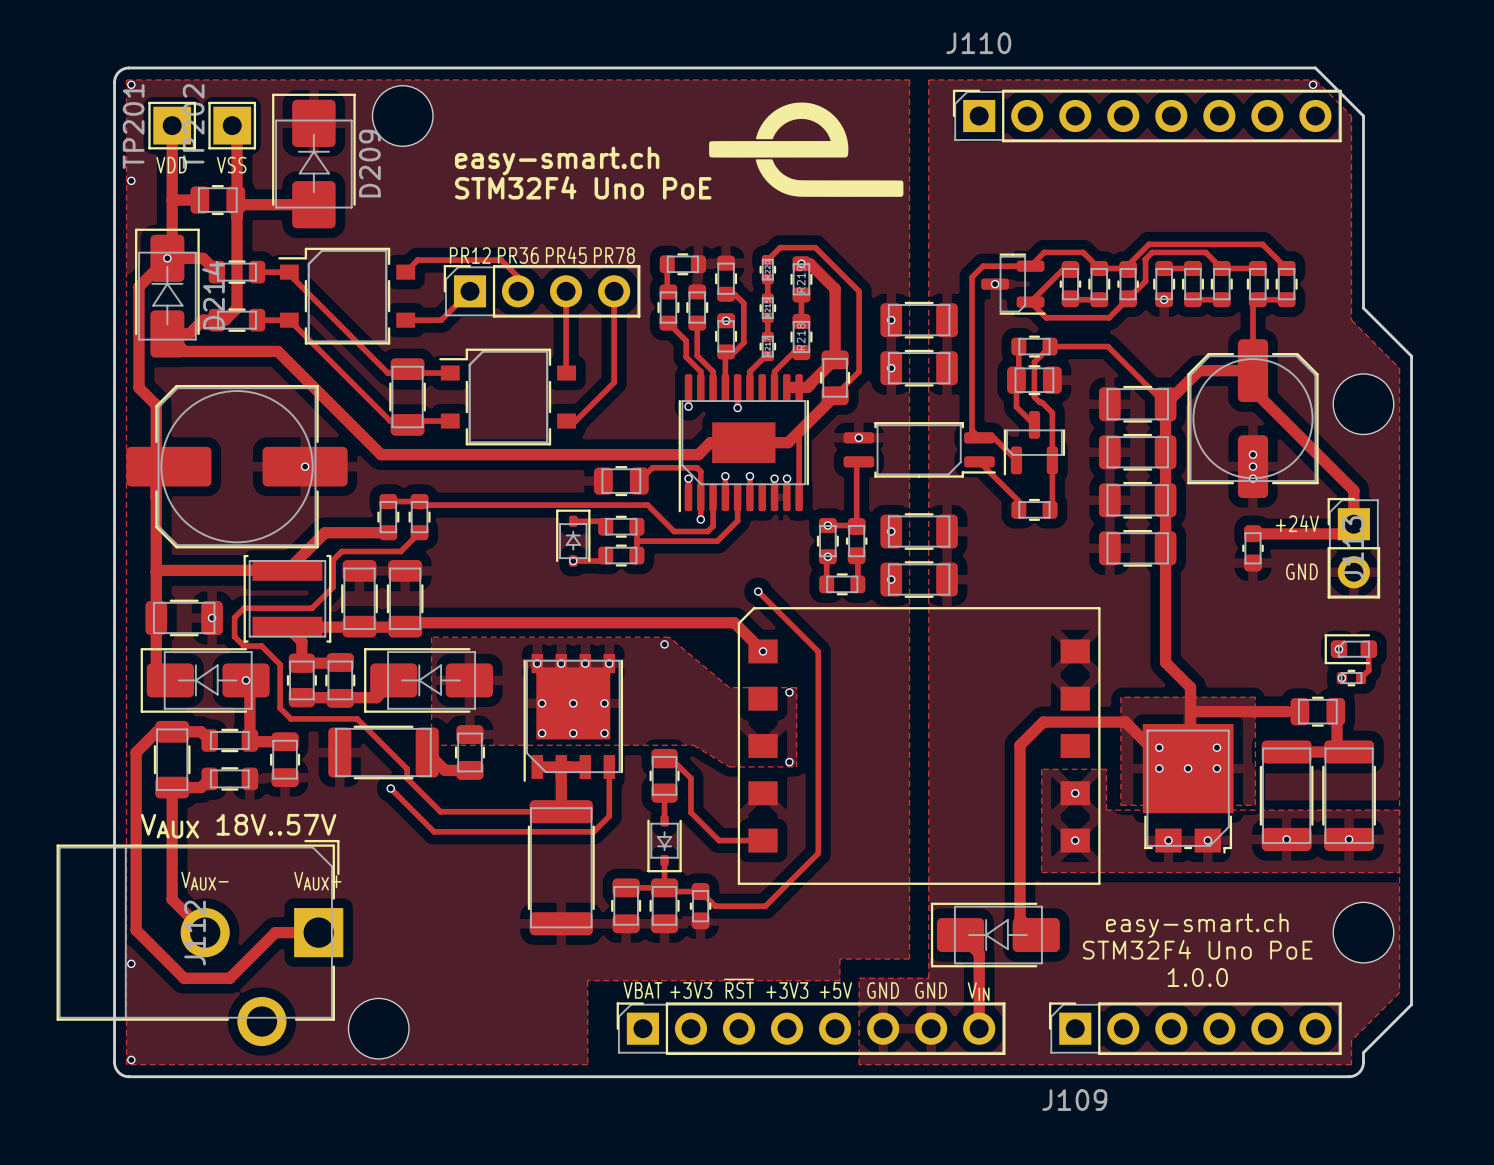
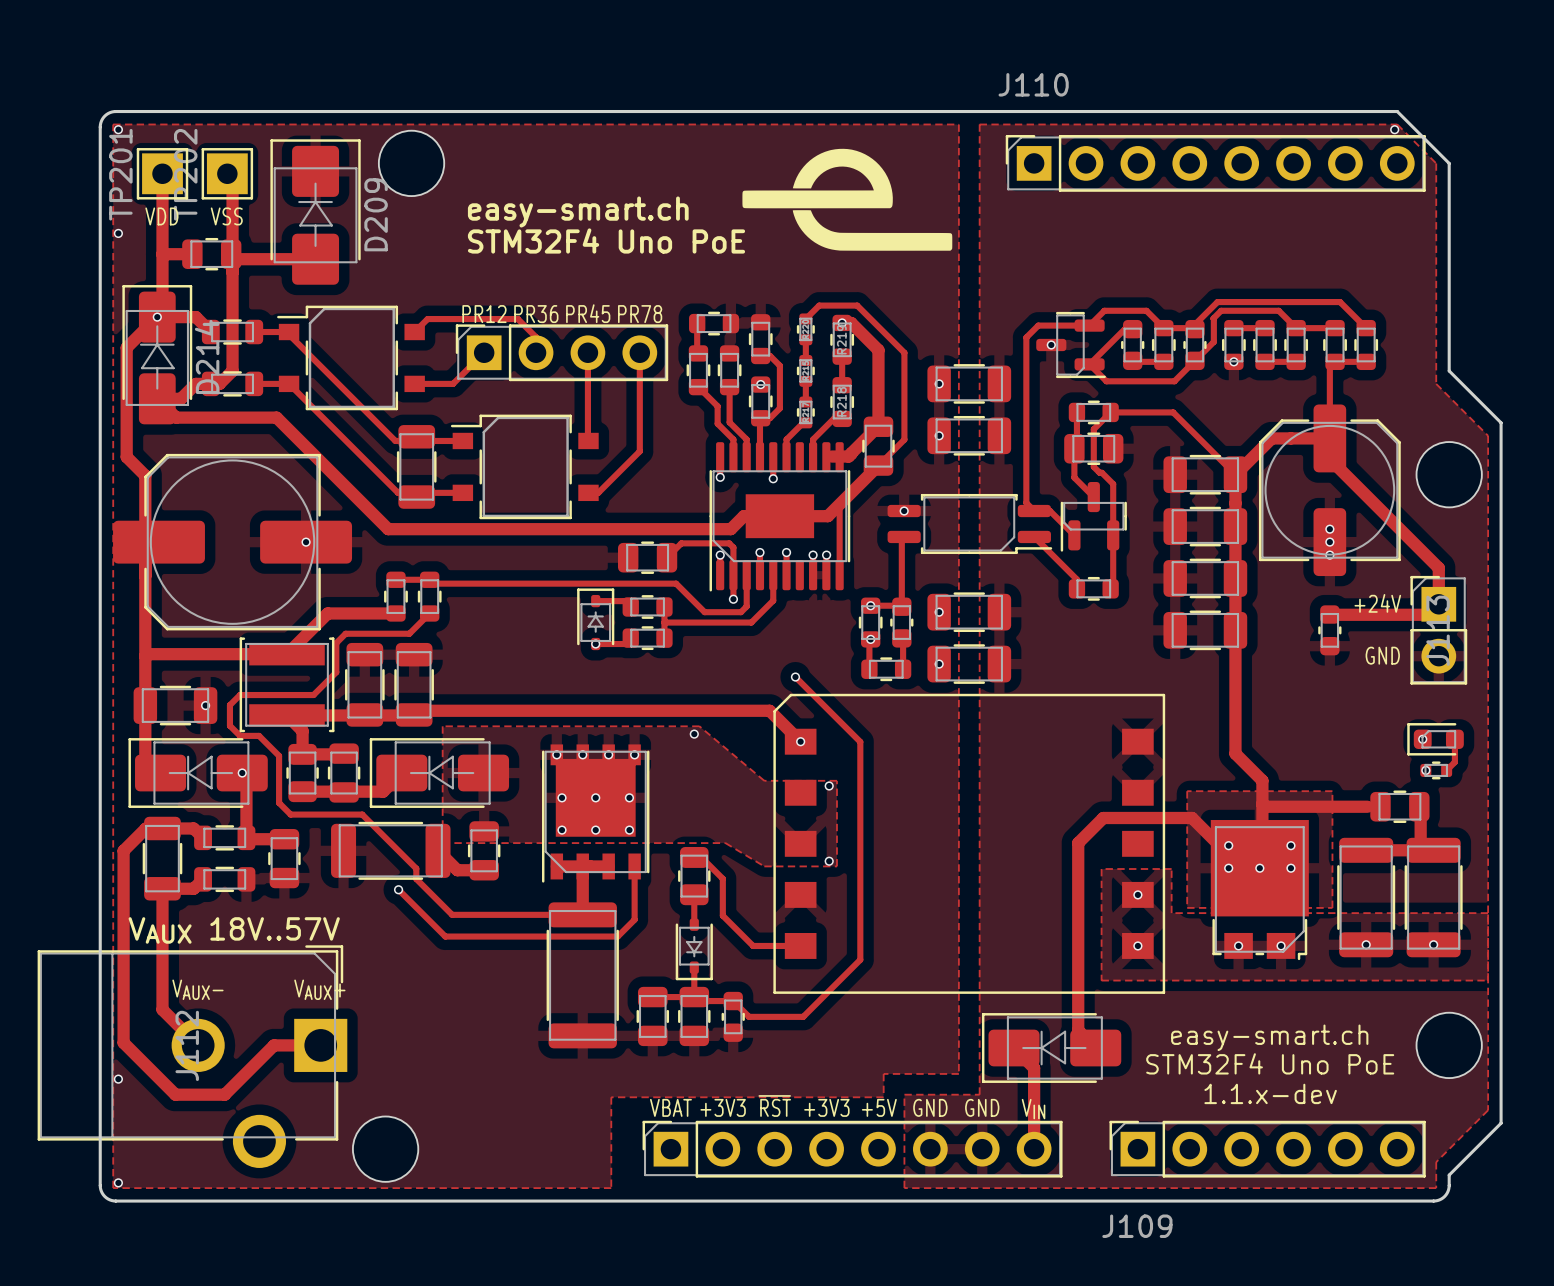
text: 1.0.0 (1197, 977) -> 1.1.x-dev (1270, 1093)

